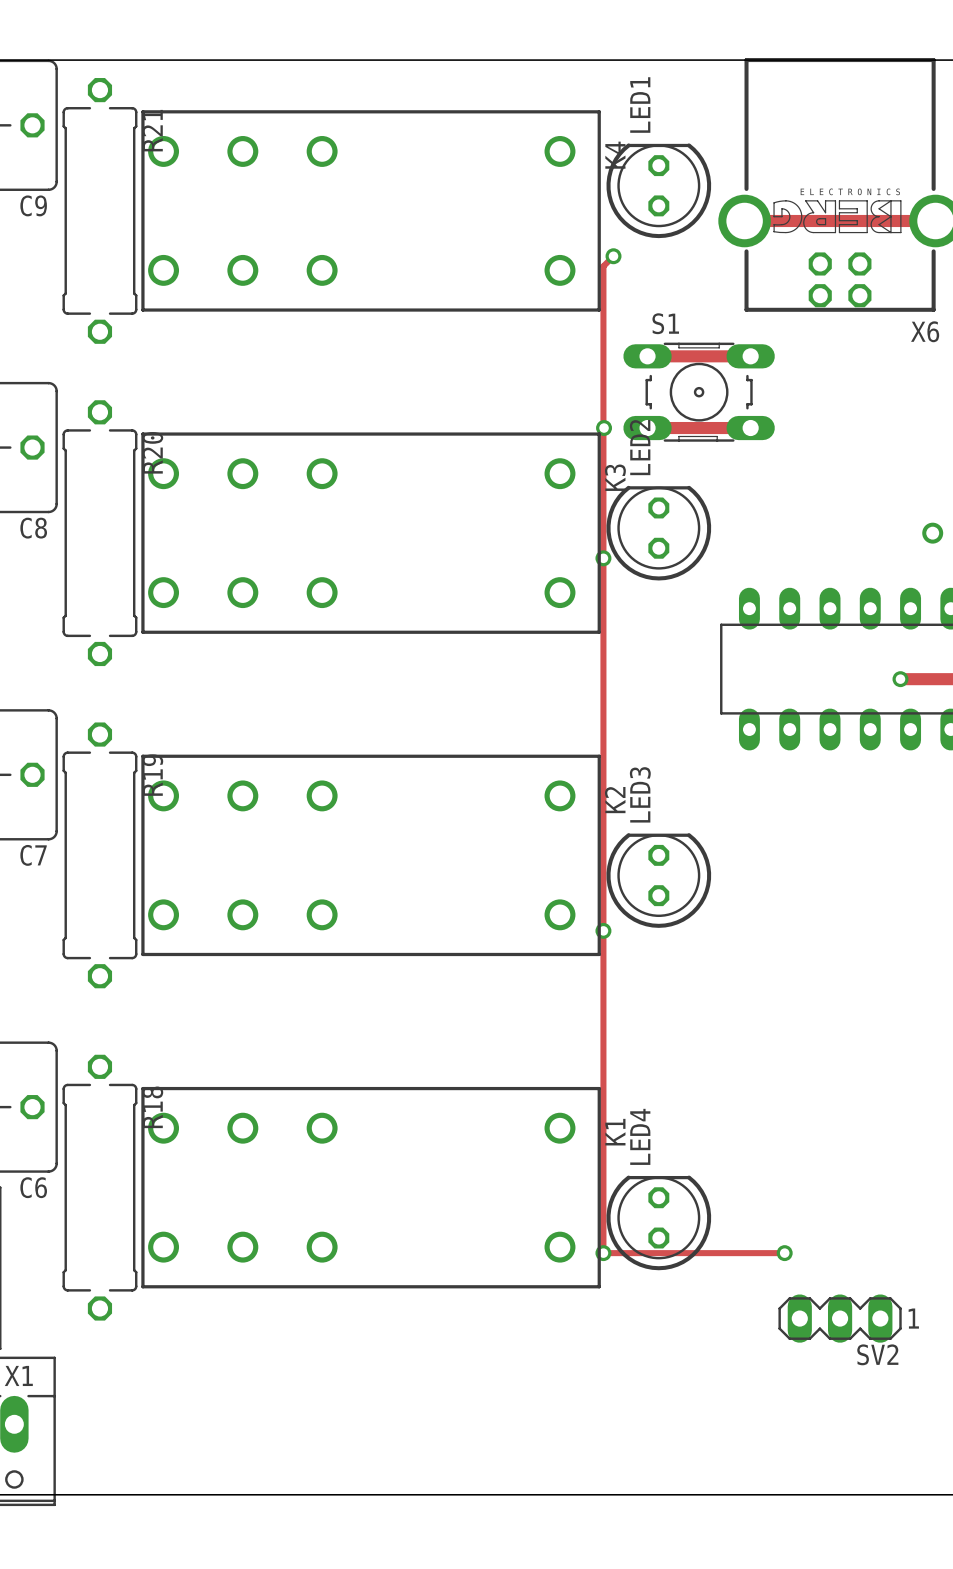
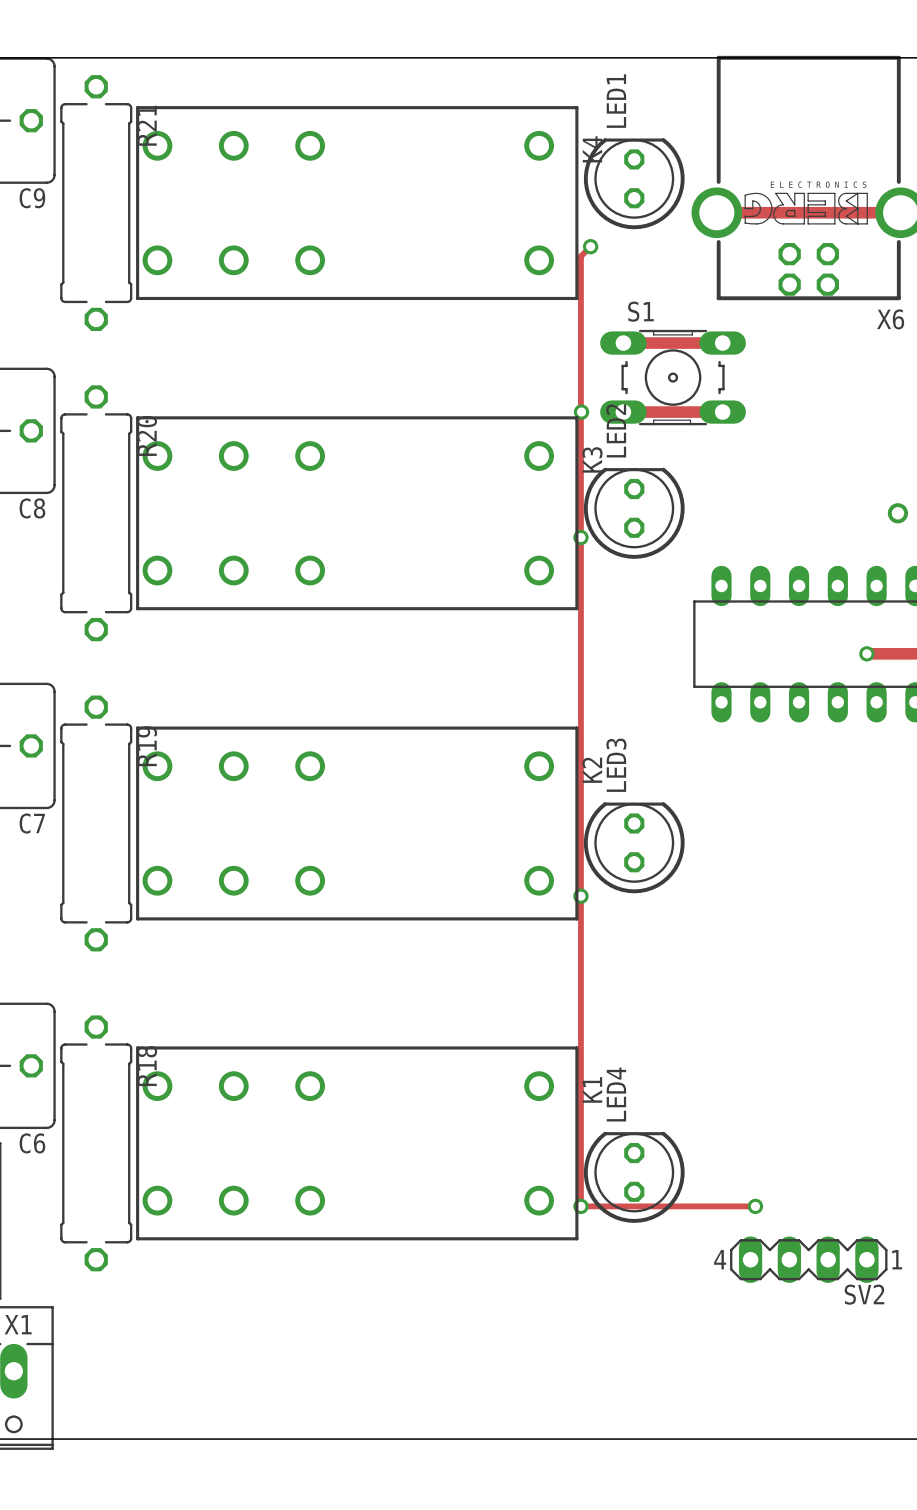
SV2 footprint: [778, 1294, 902, 1343] -> [730, 1236, 888, 1283]

